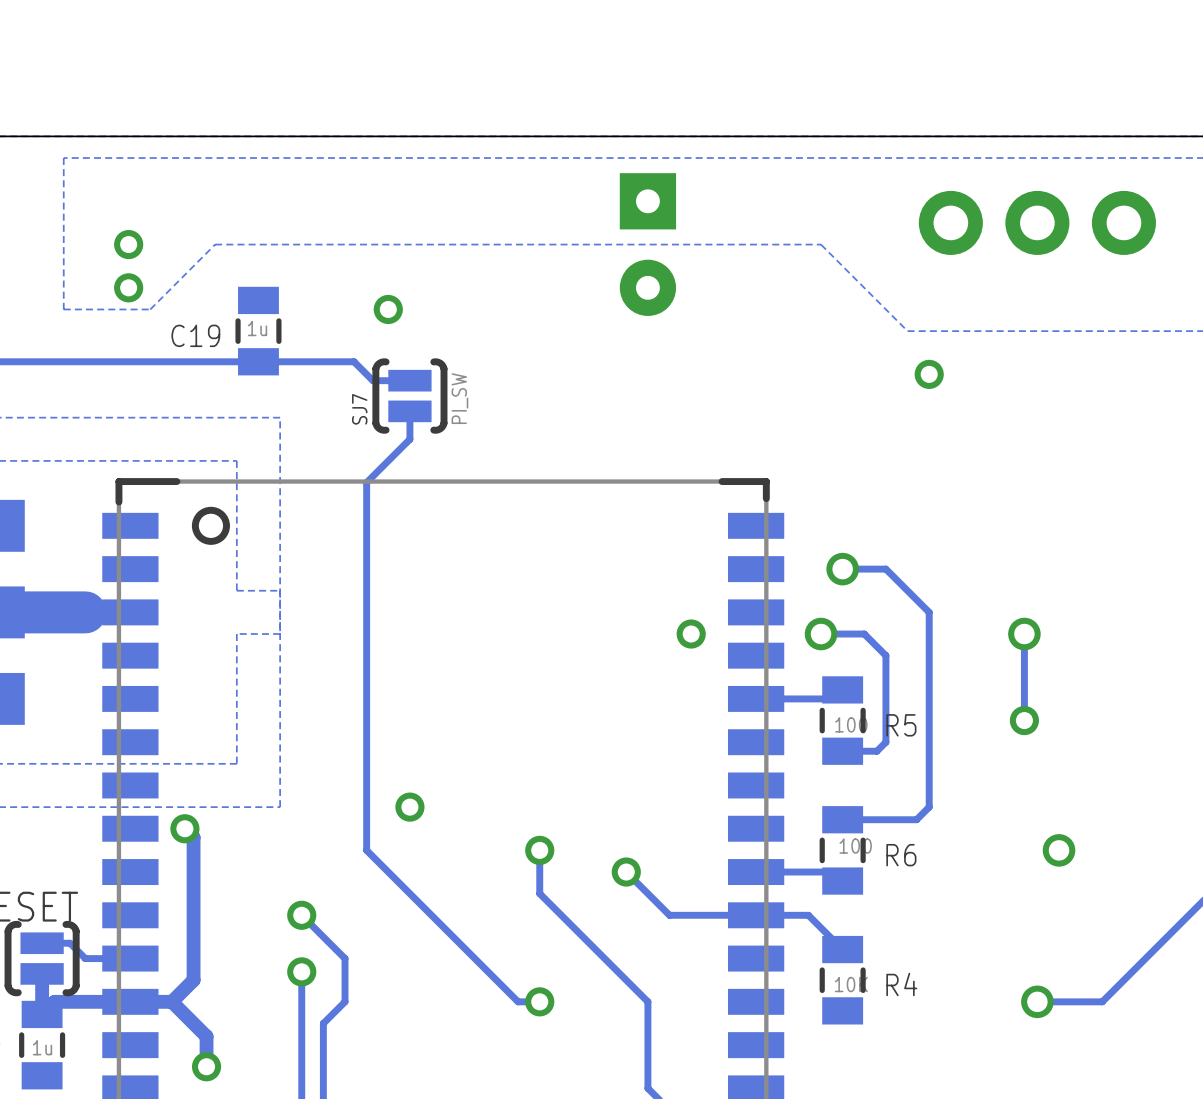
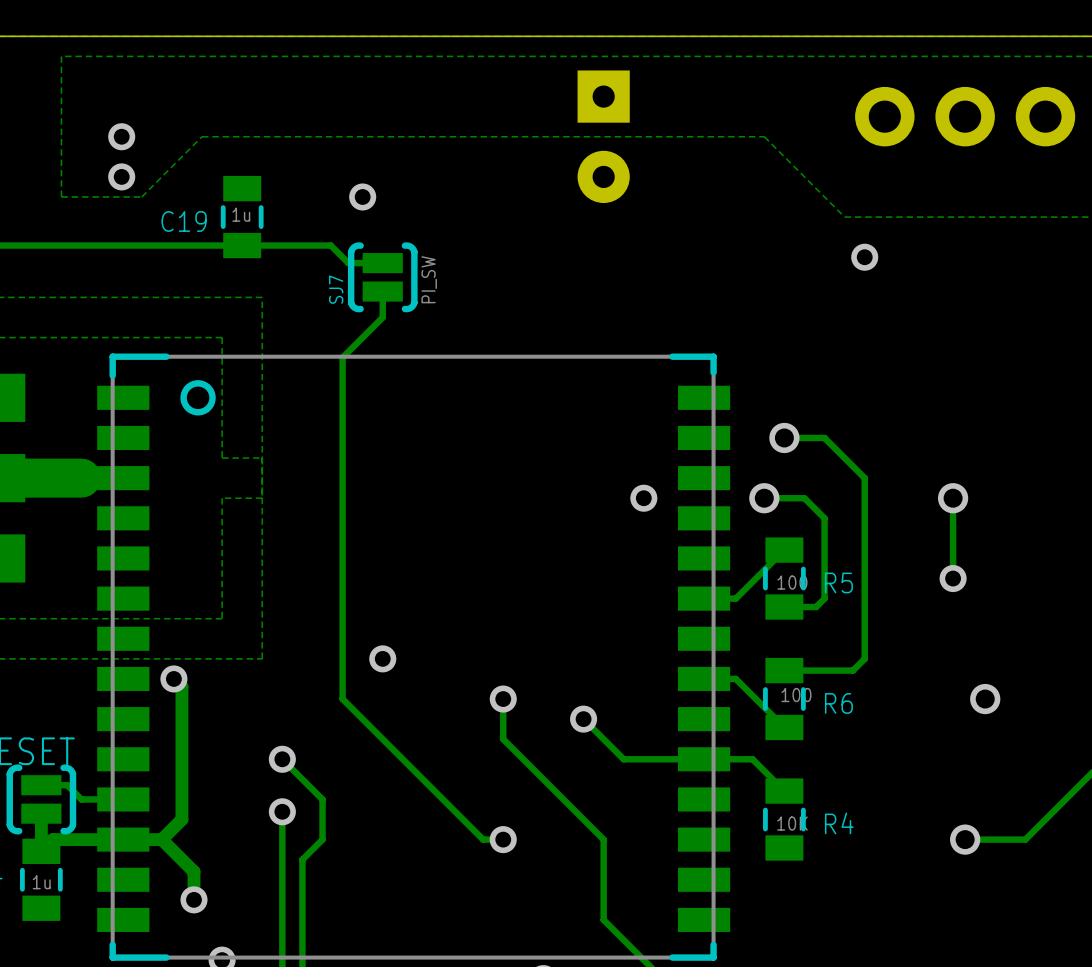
track: (833, 698) (756, 698) -> (776, 558) (735, 598) (704, 598)
track: (833, 872) (756, 872) -> (776, 719) (735, 678) (704, 678)

